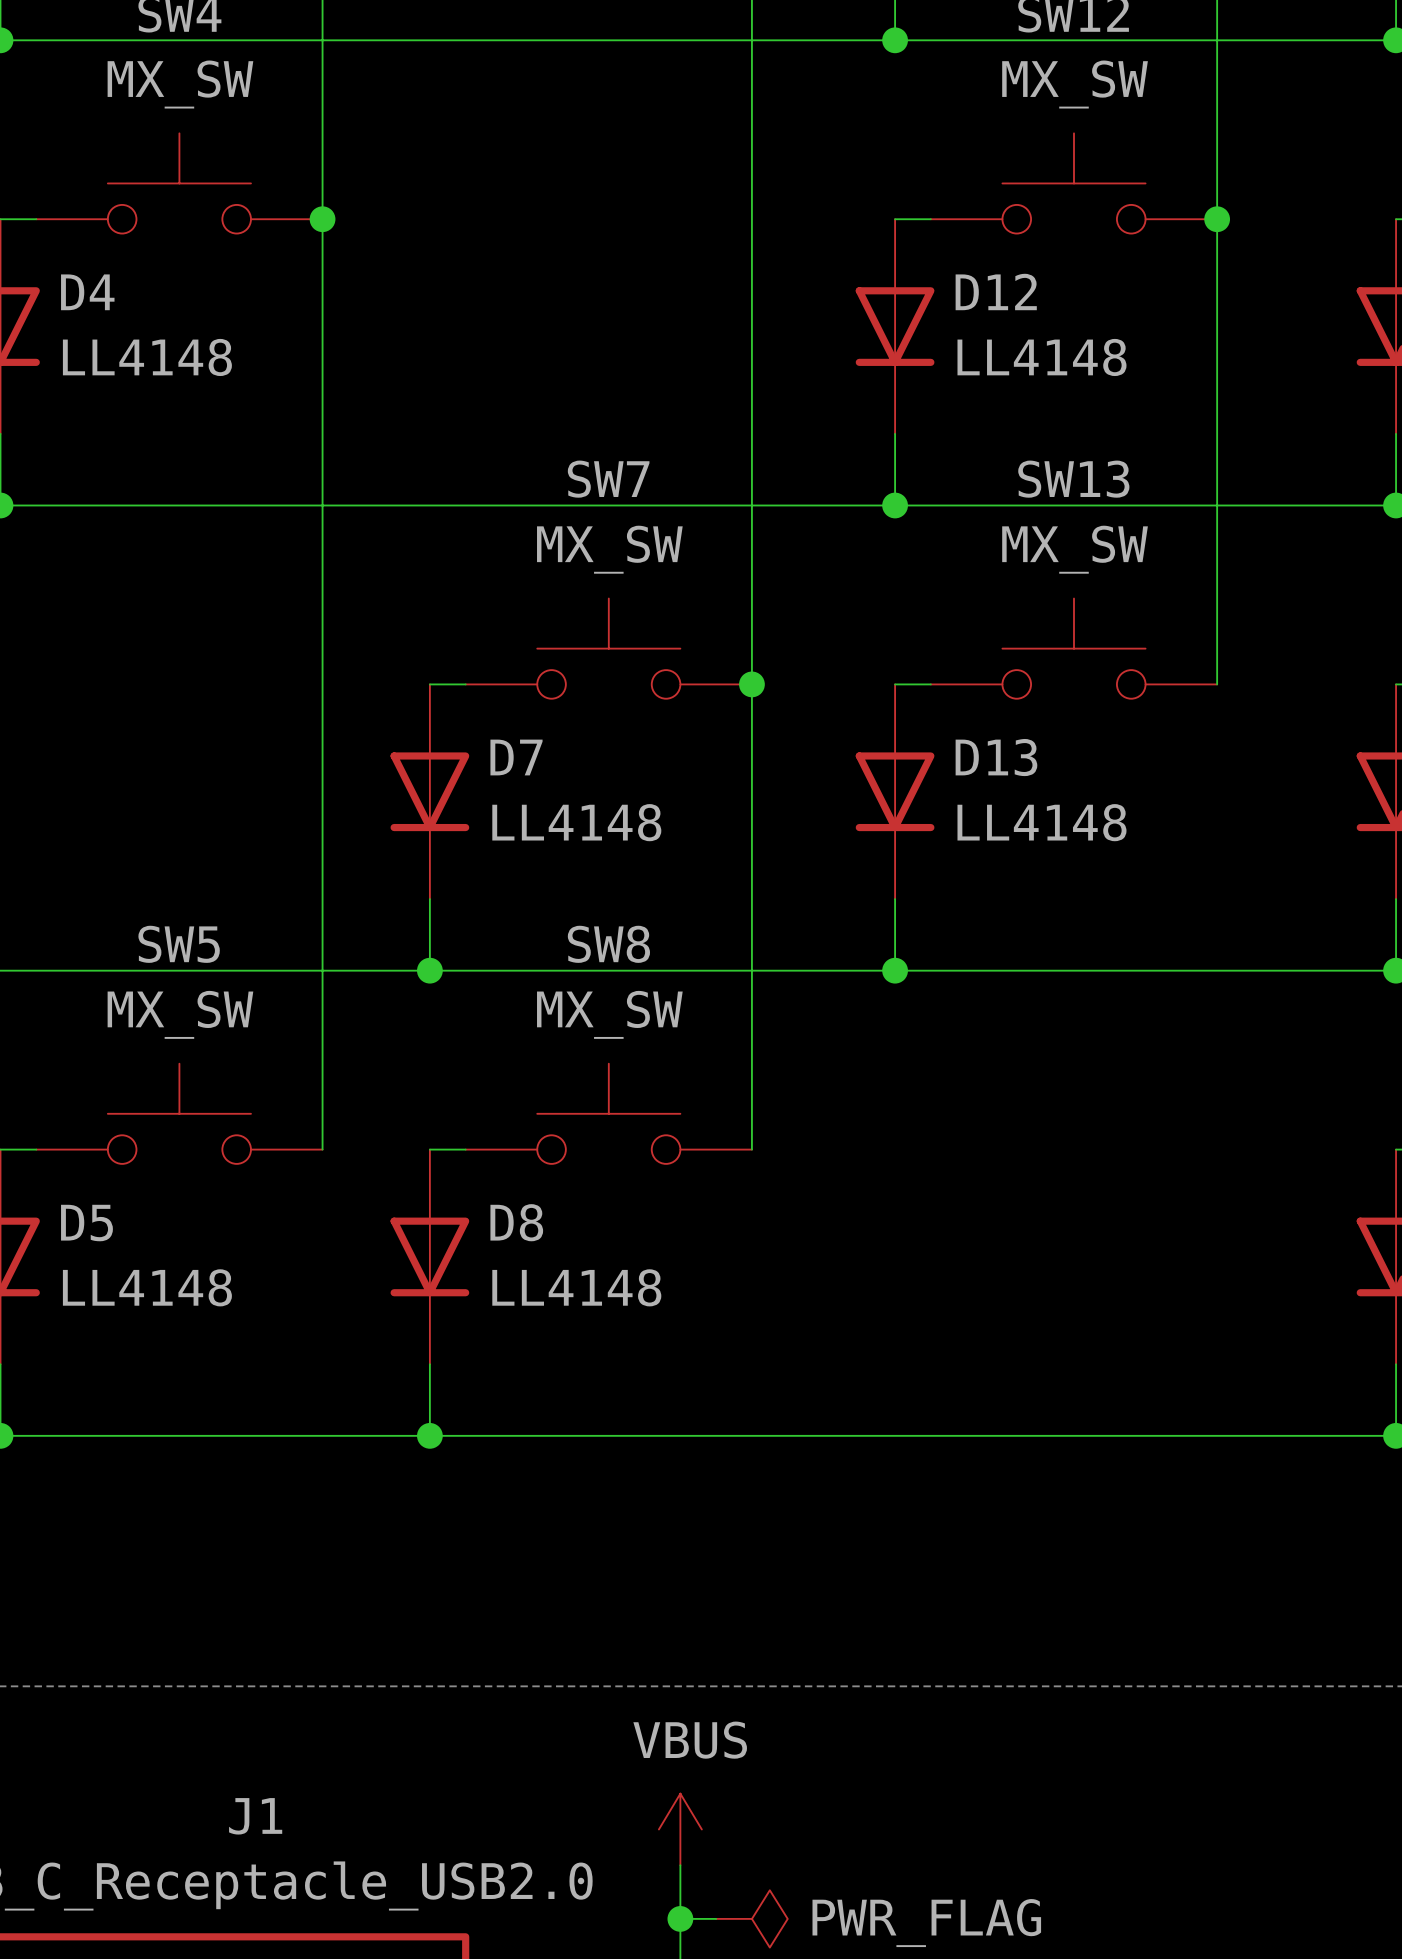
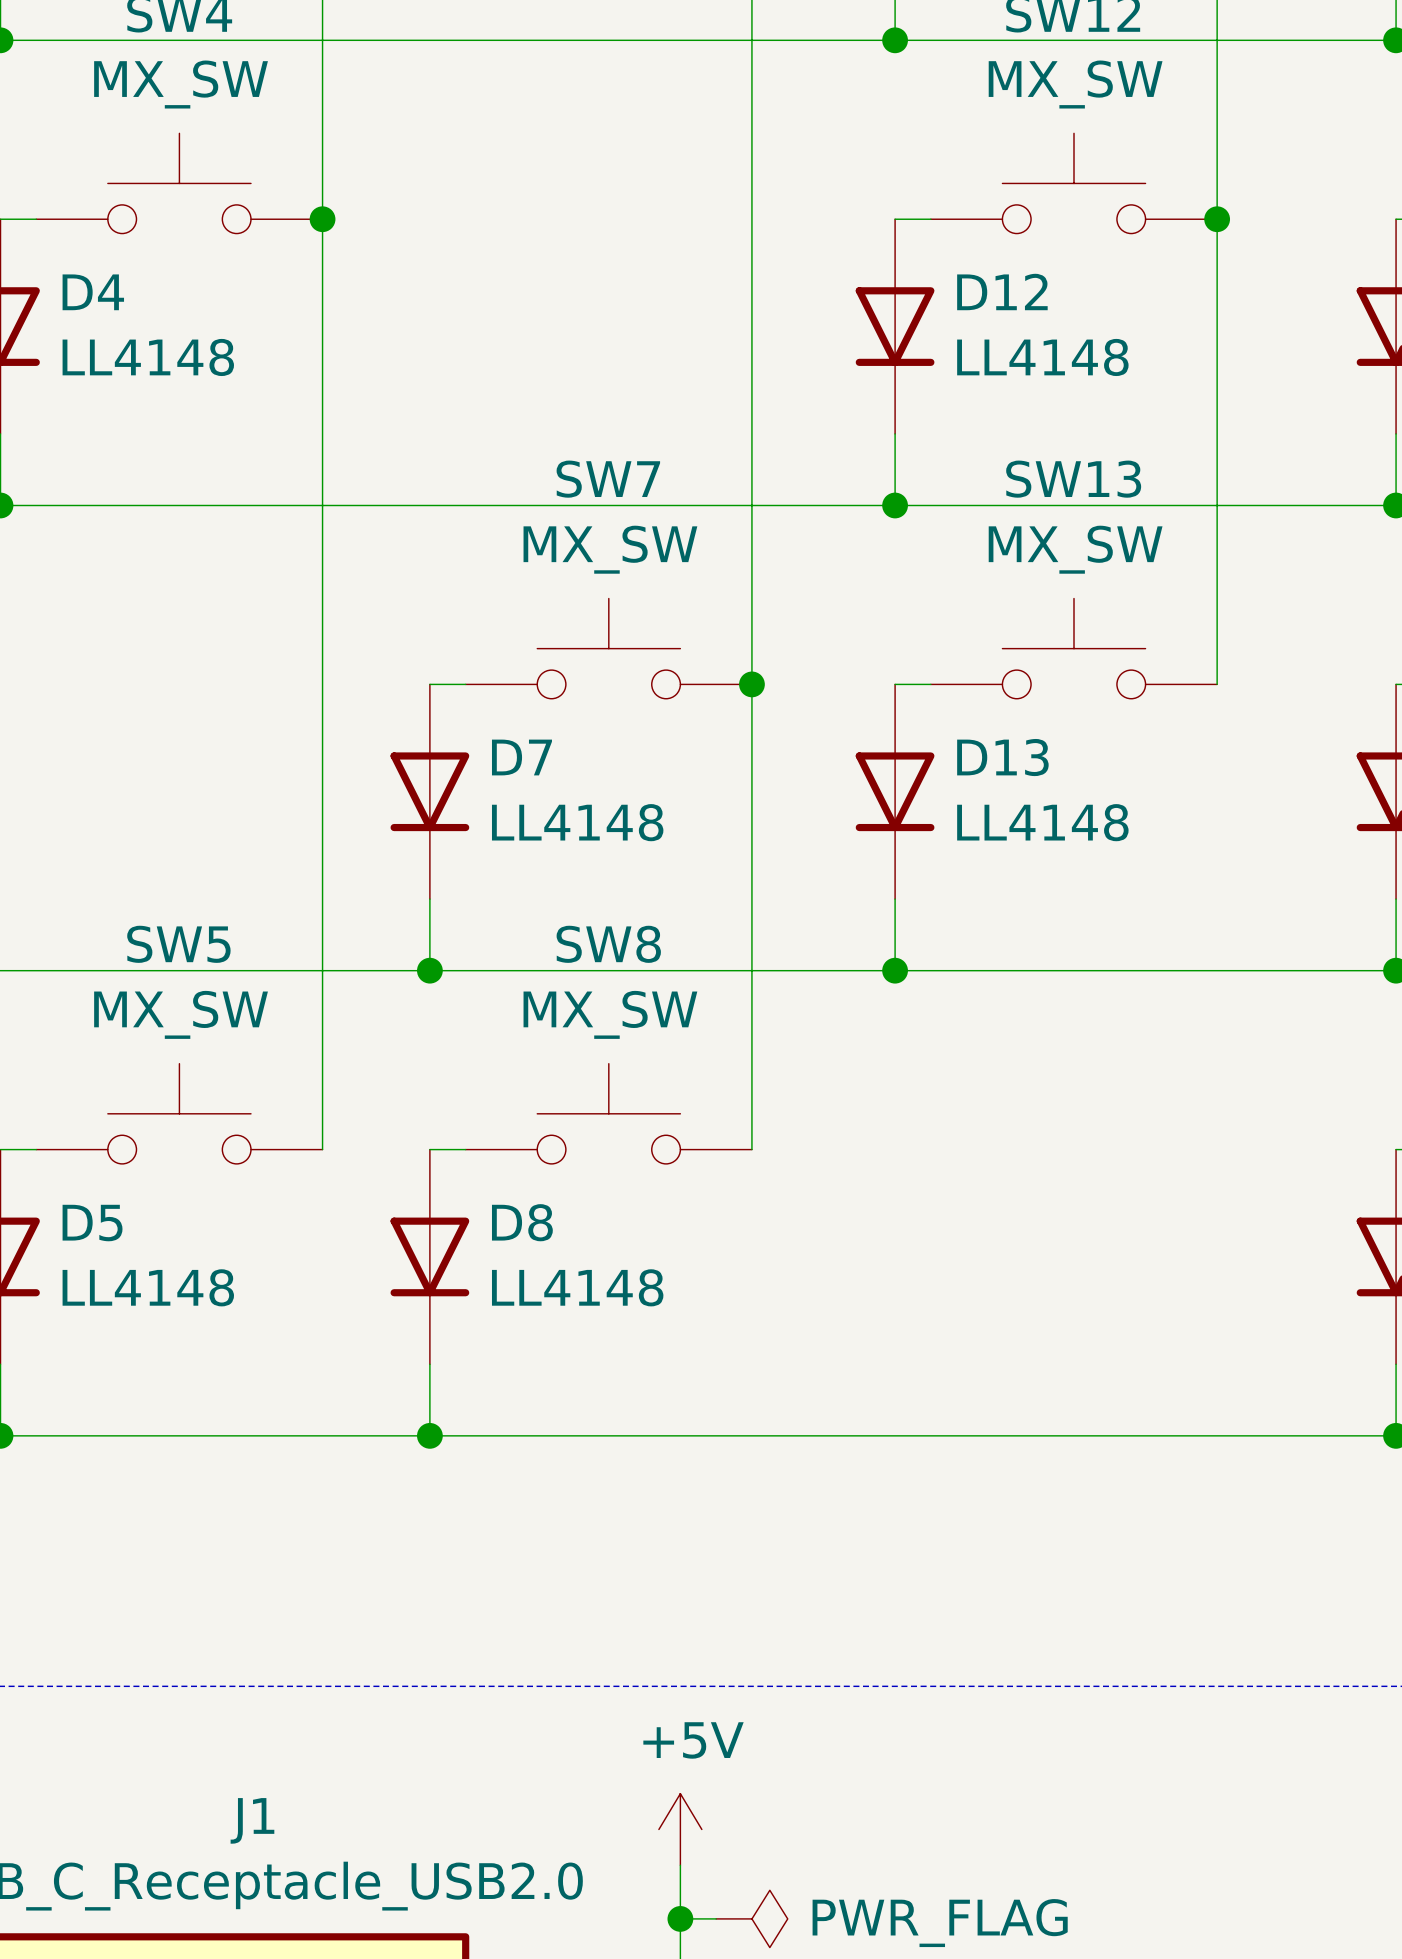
power symbol: VBUS (680, 1829) -> +5V (680, 1829)

